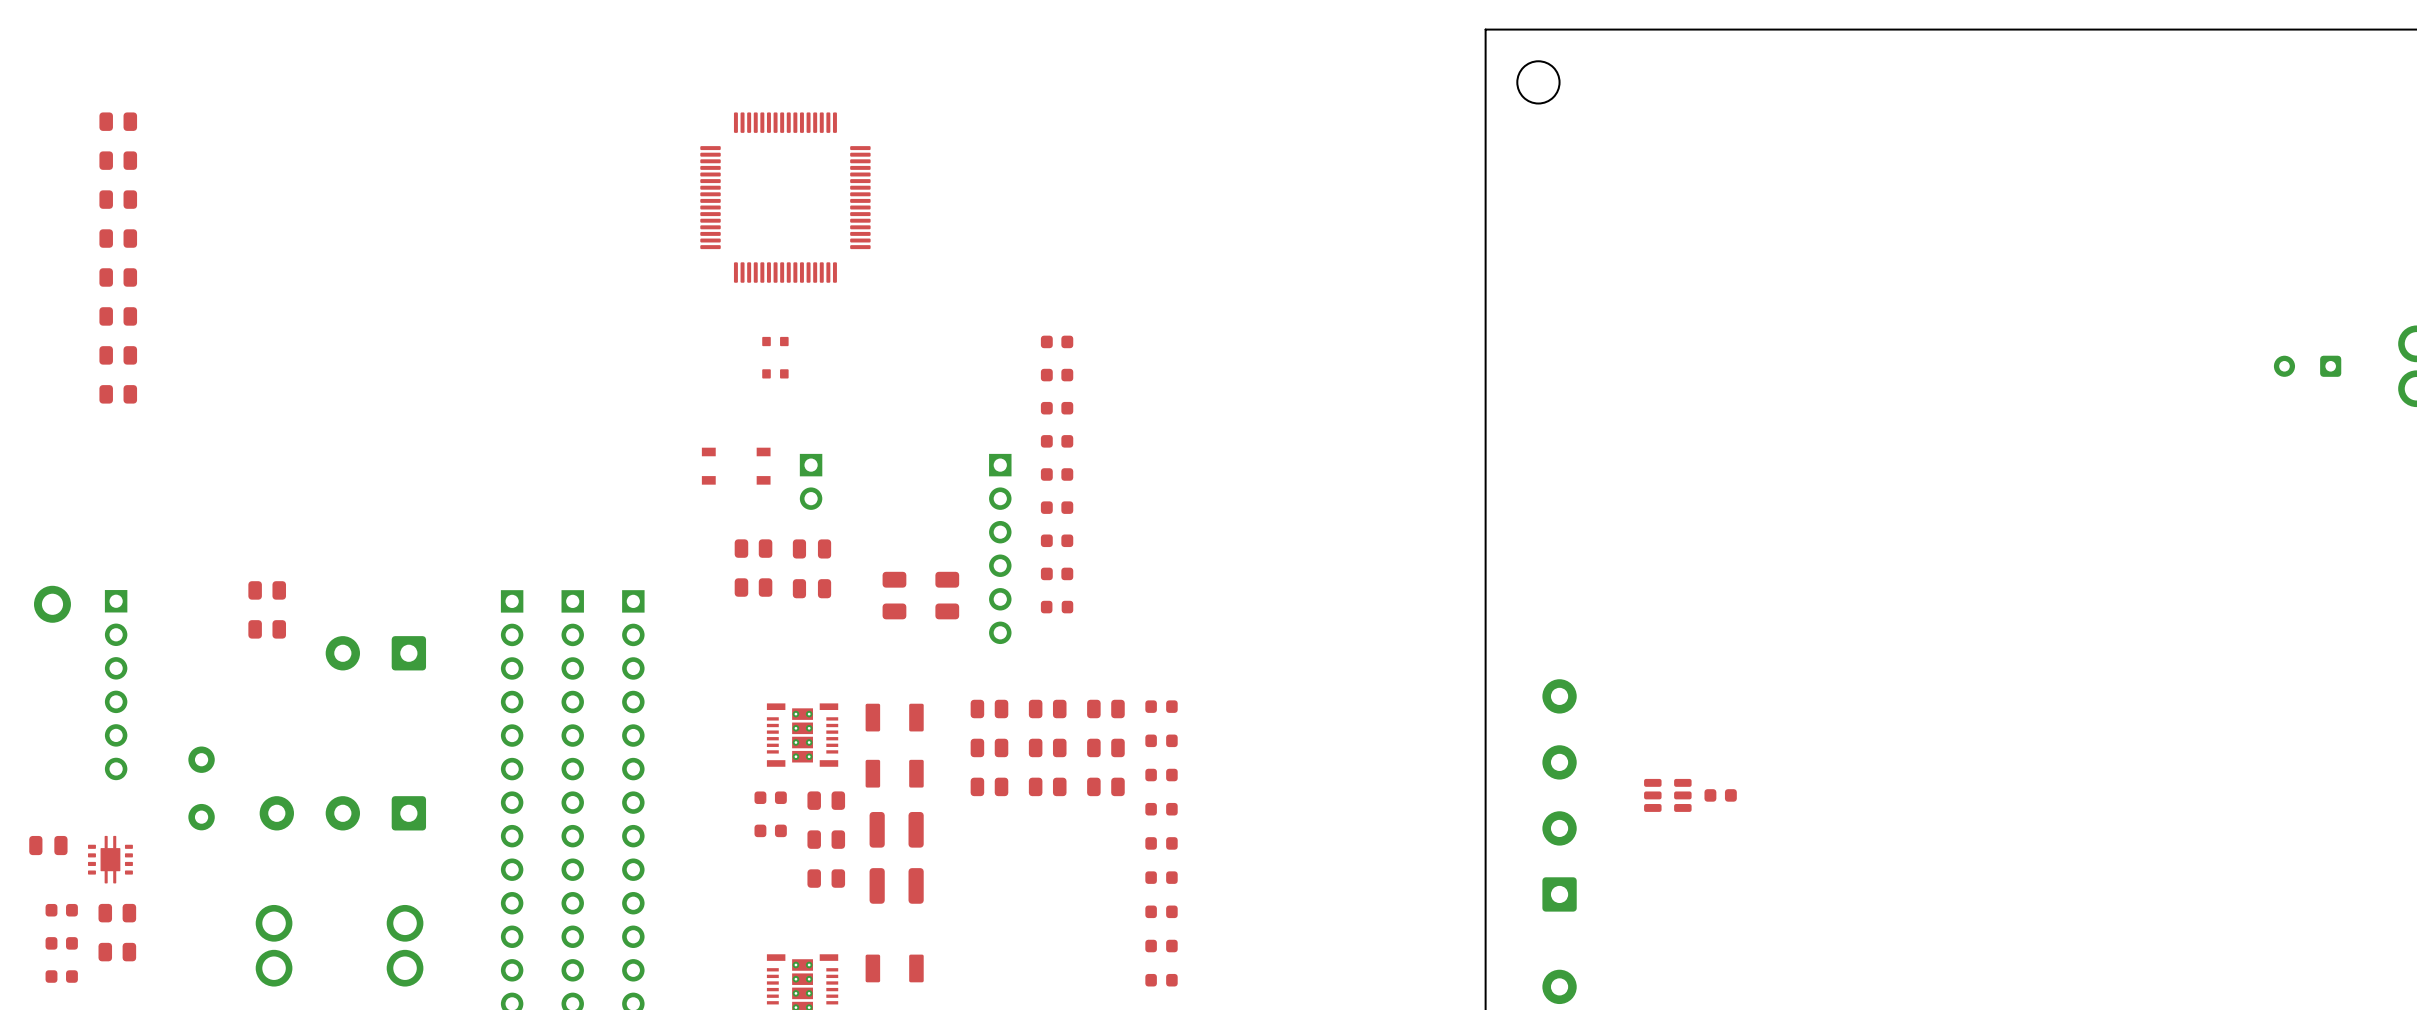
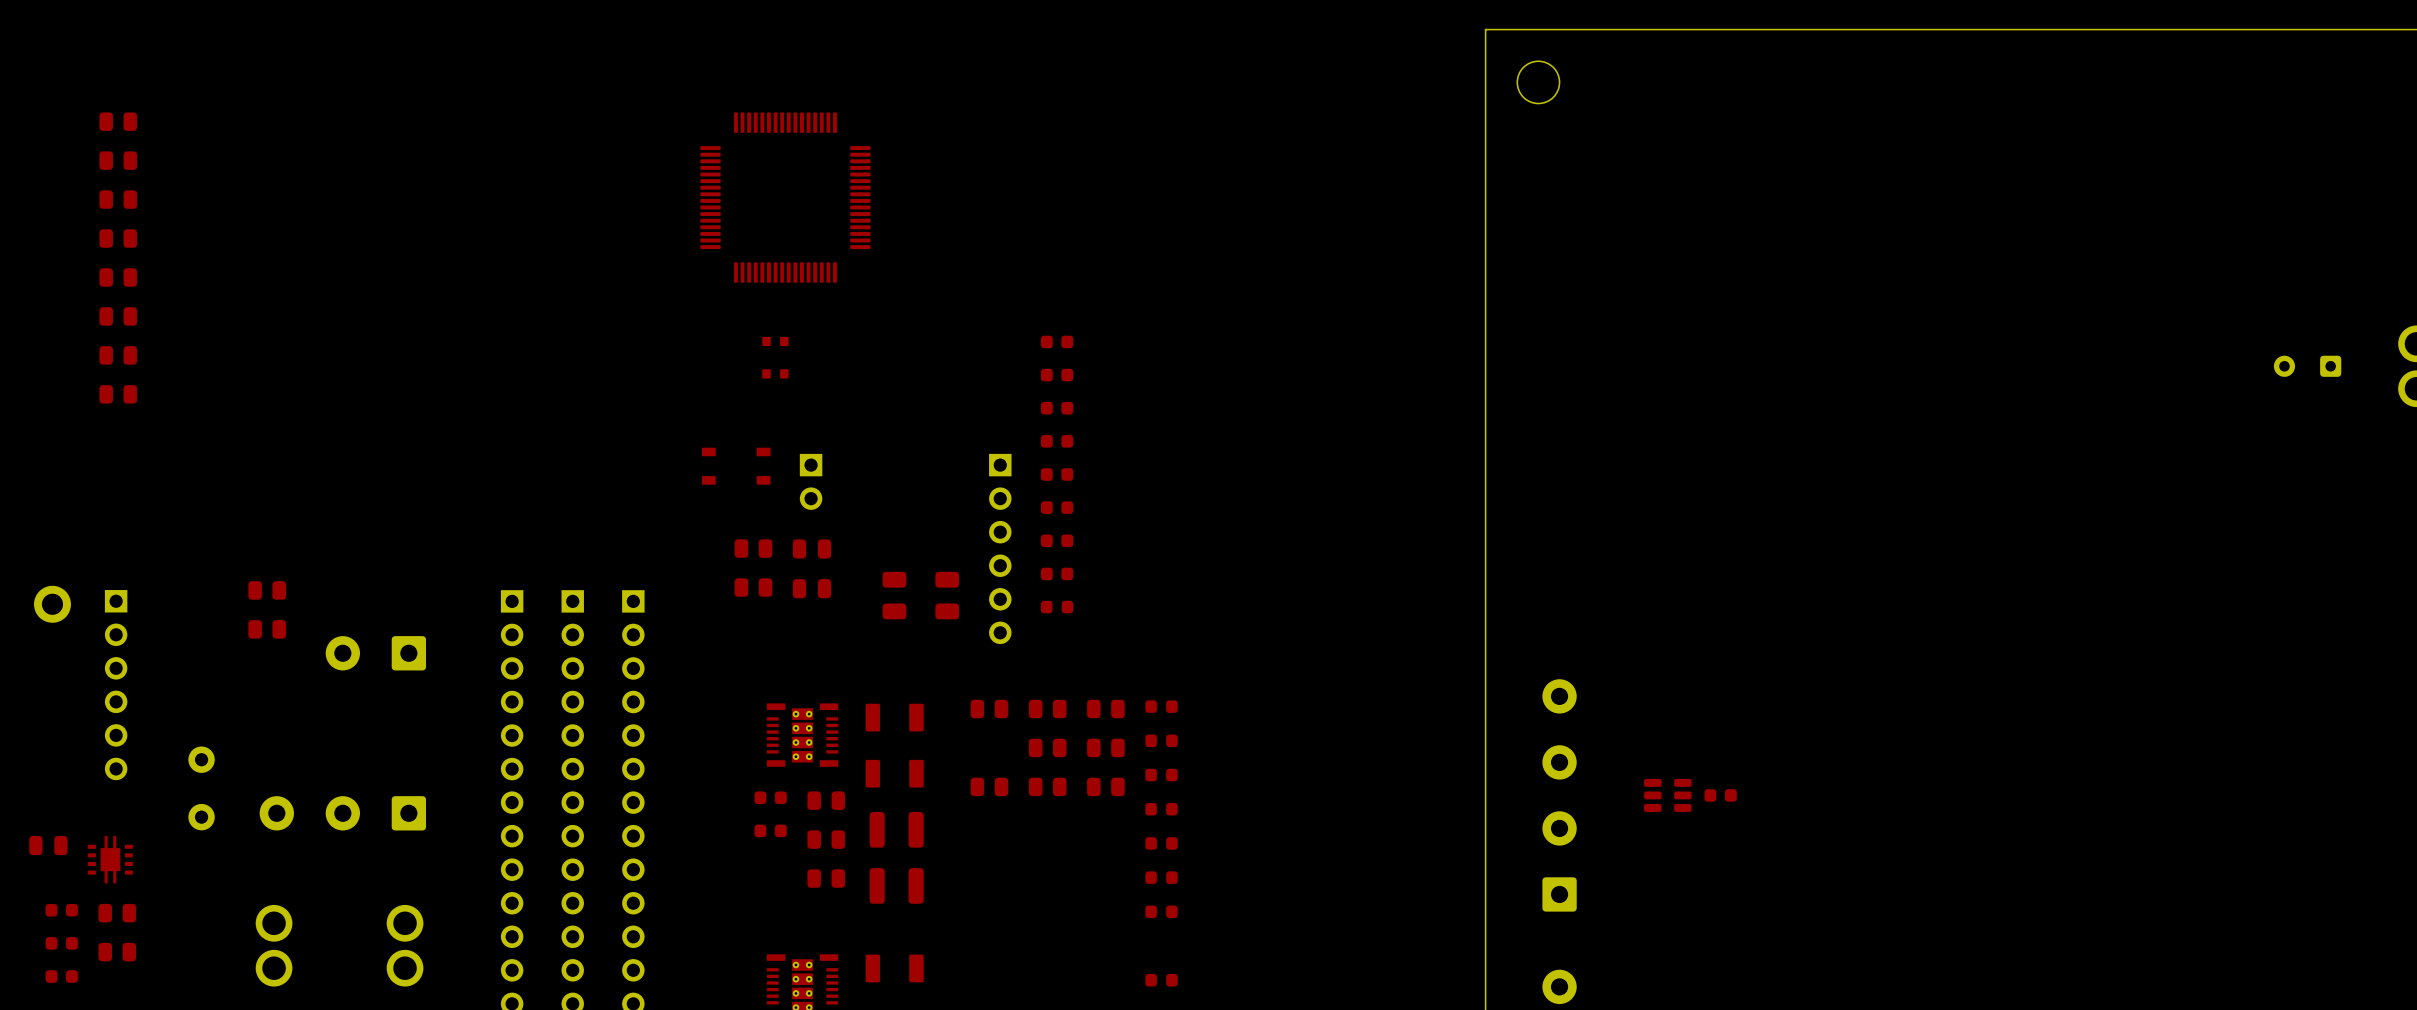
part: (989, 747) -> none
part: (1161, 946) -> none

